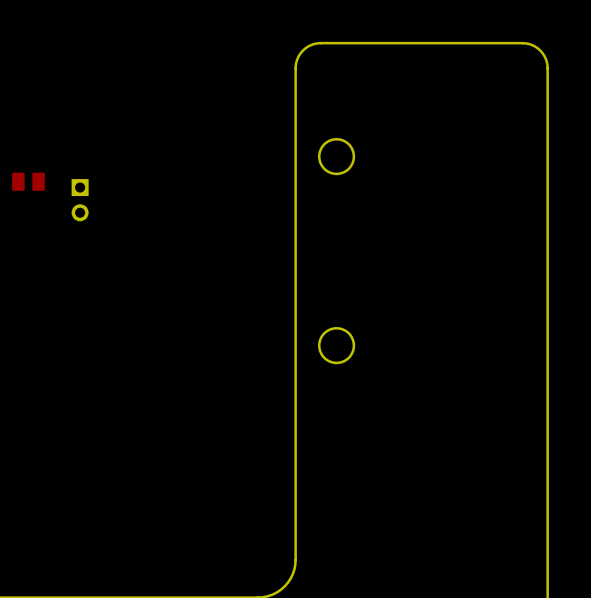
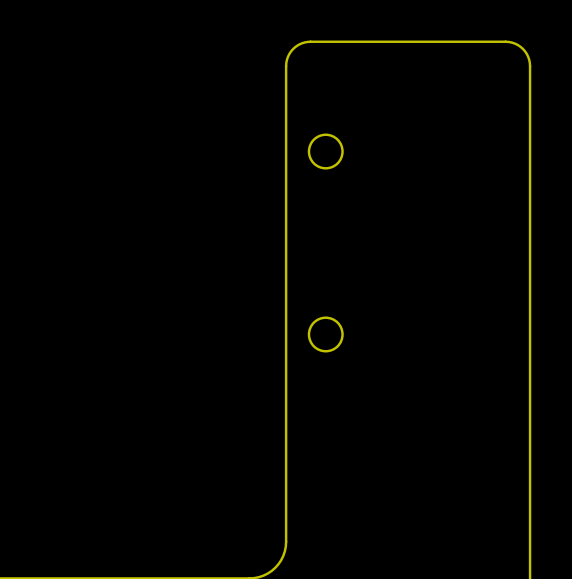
part: (28, 181) -> none
part: (80, 200) -> none

